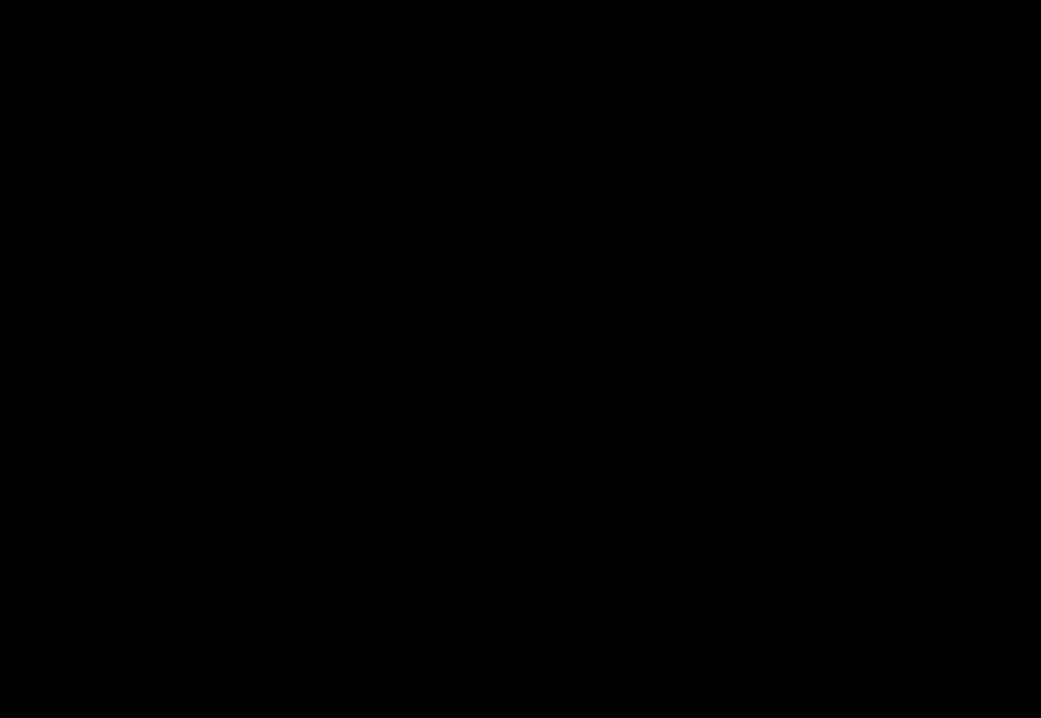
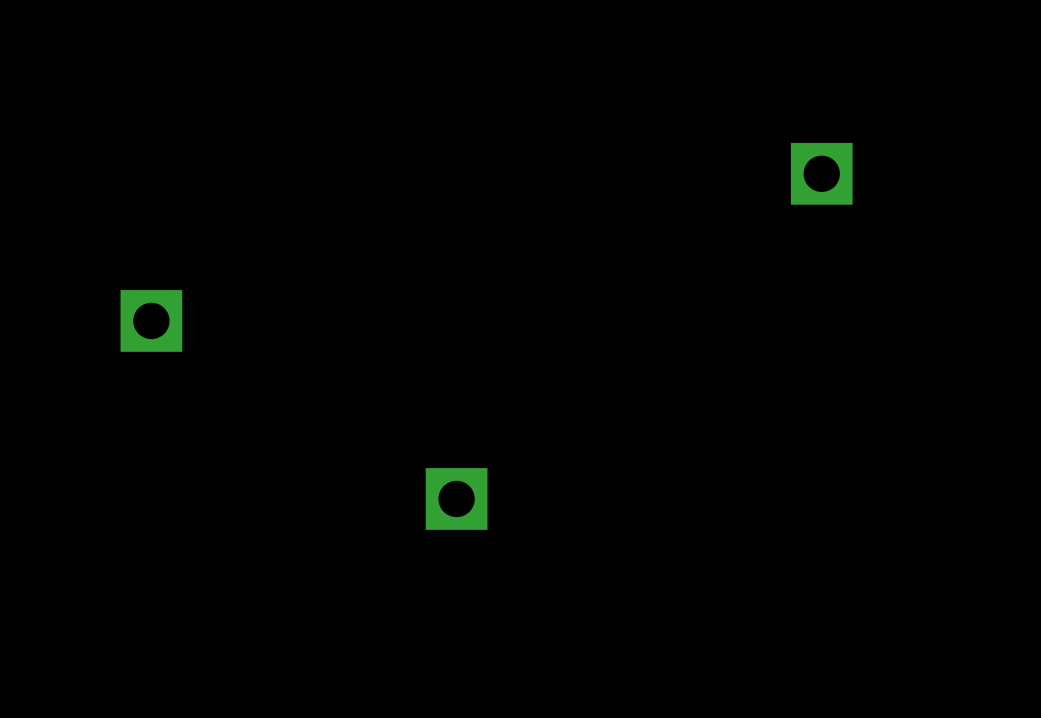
part: none -> (821, 173)
part: none -> (151, 320)
part: none -> (456, 498)

